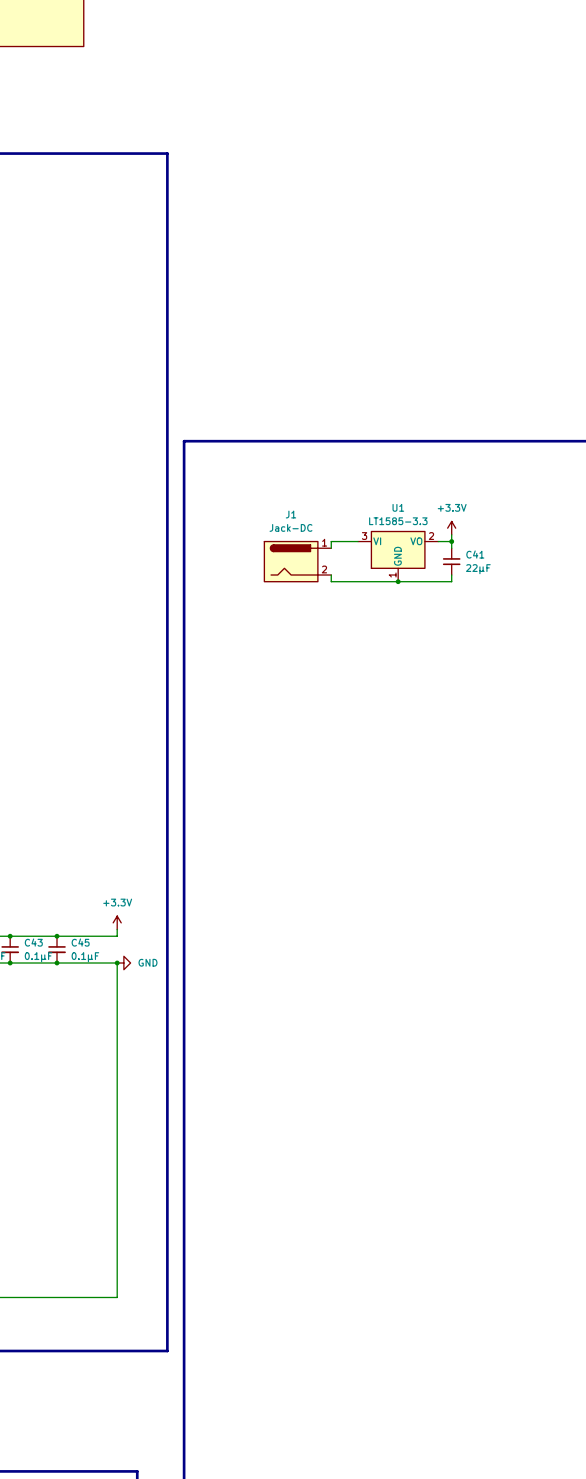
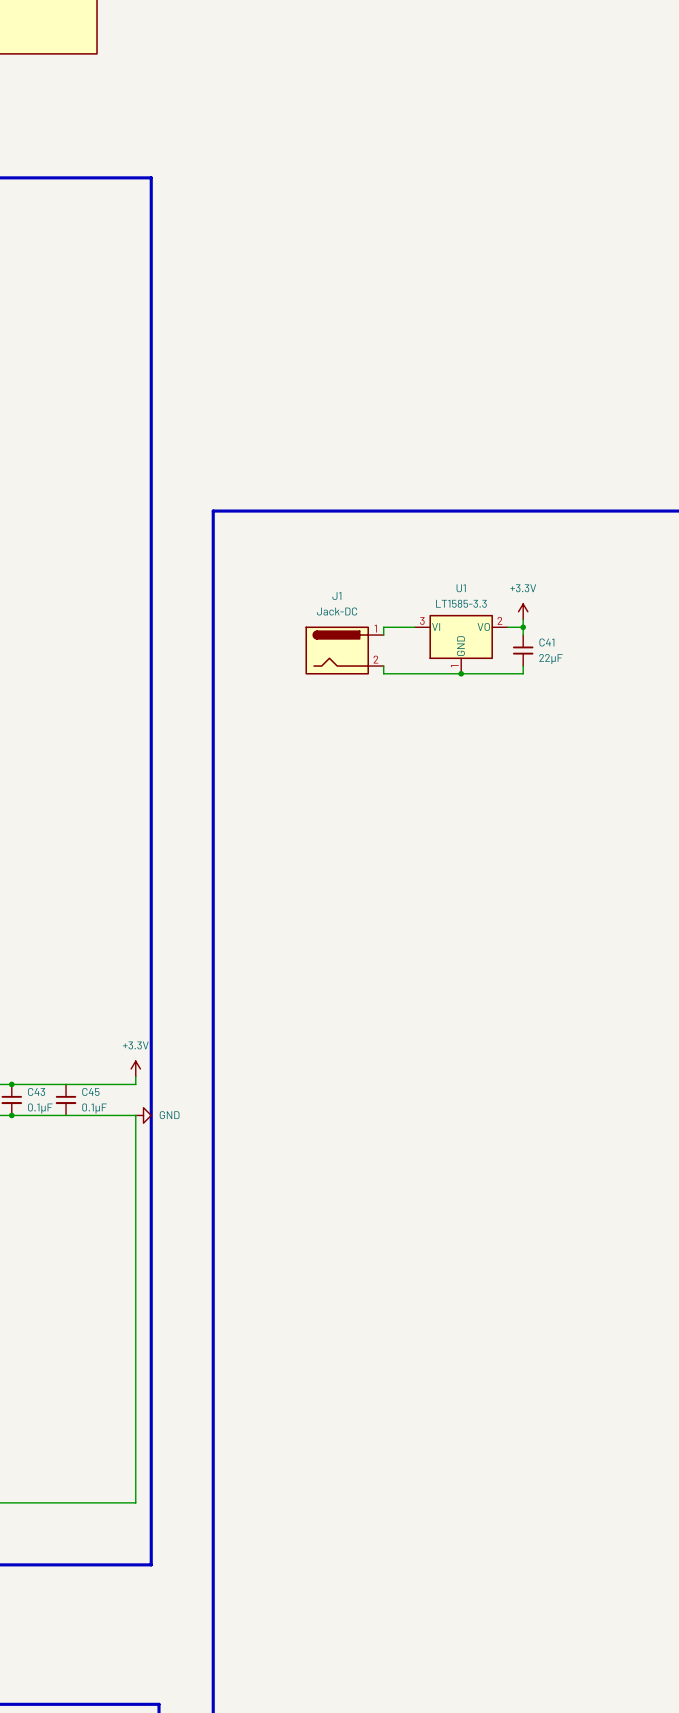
line: (130, 153) (167, 153) (167, 1351) (130, 1351) -> (151, 177) (151, 1564)
junction: (57, 936) -> none
junction: (57, 963) -> none
junction: (117, 963) -> none

